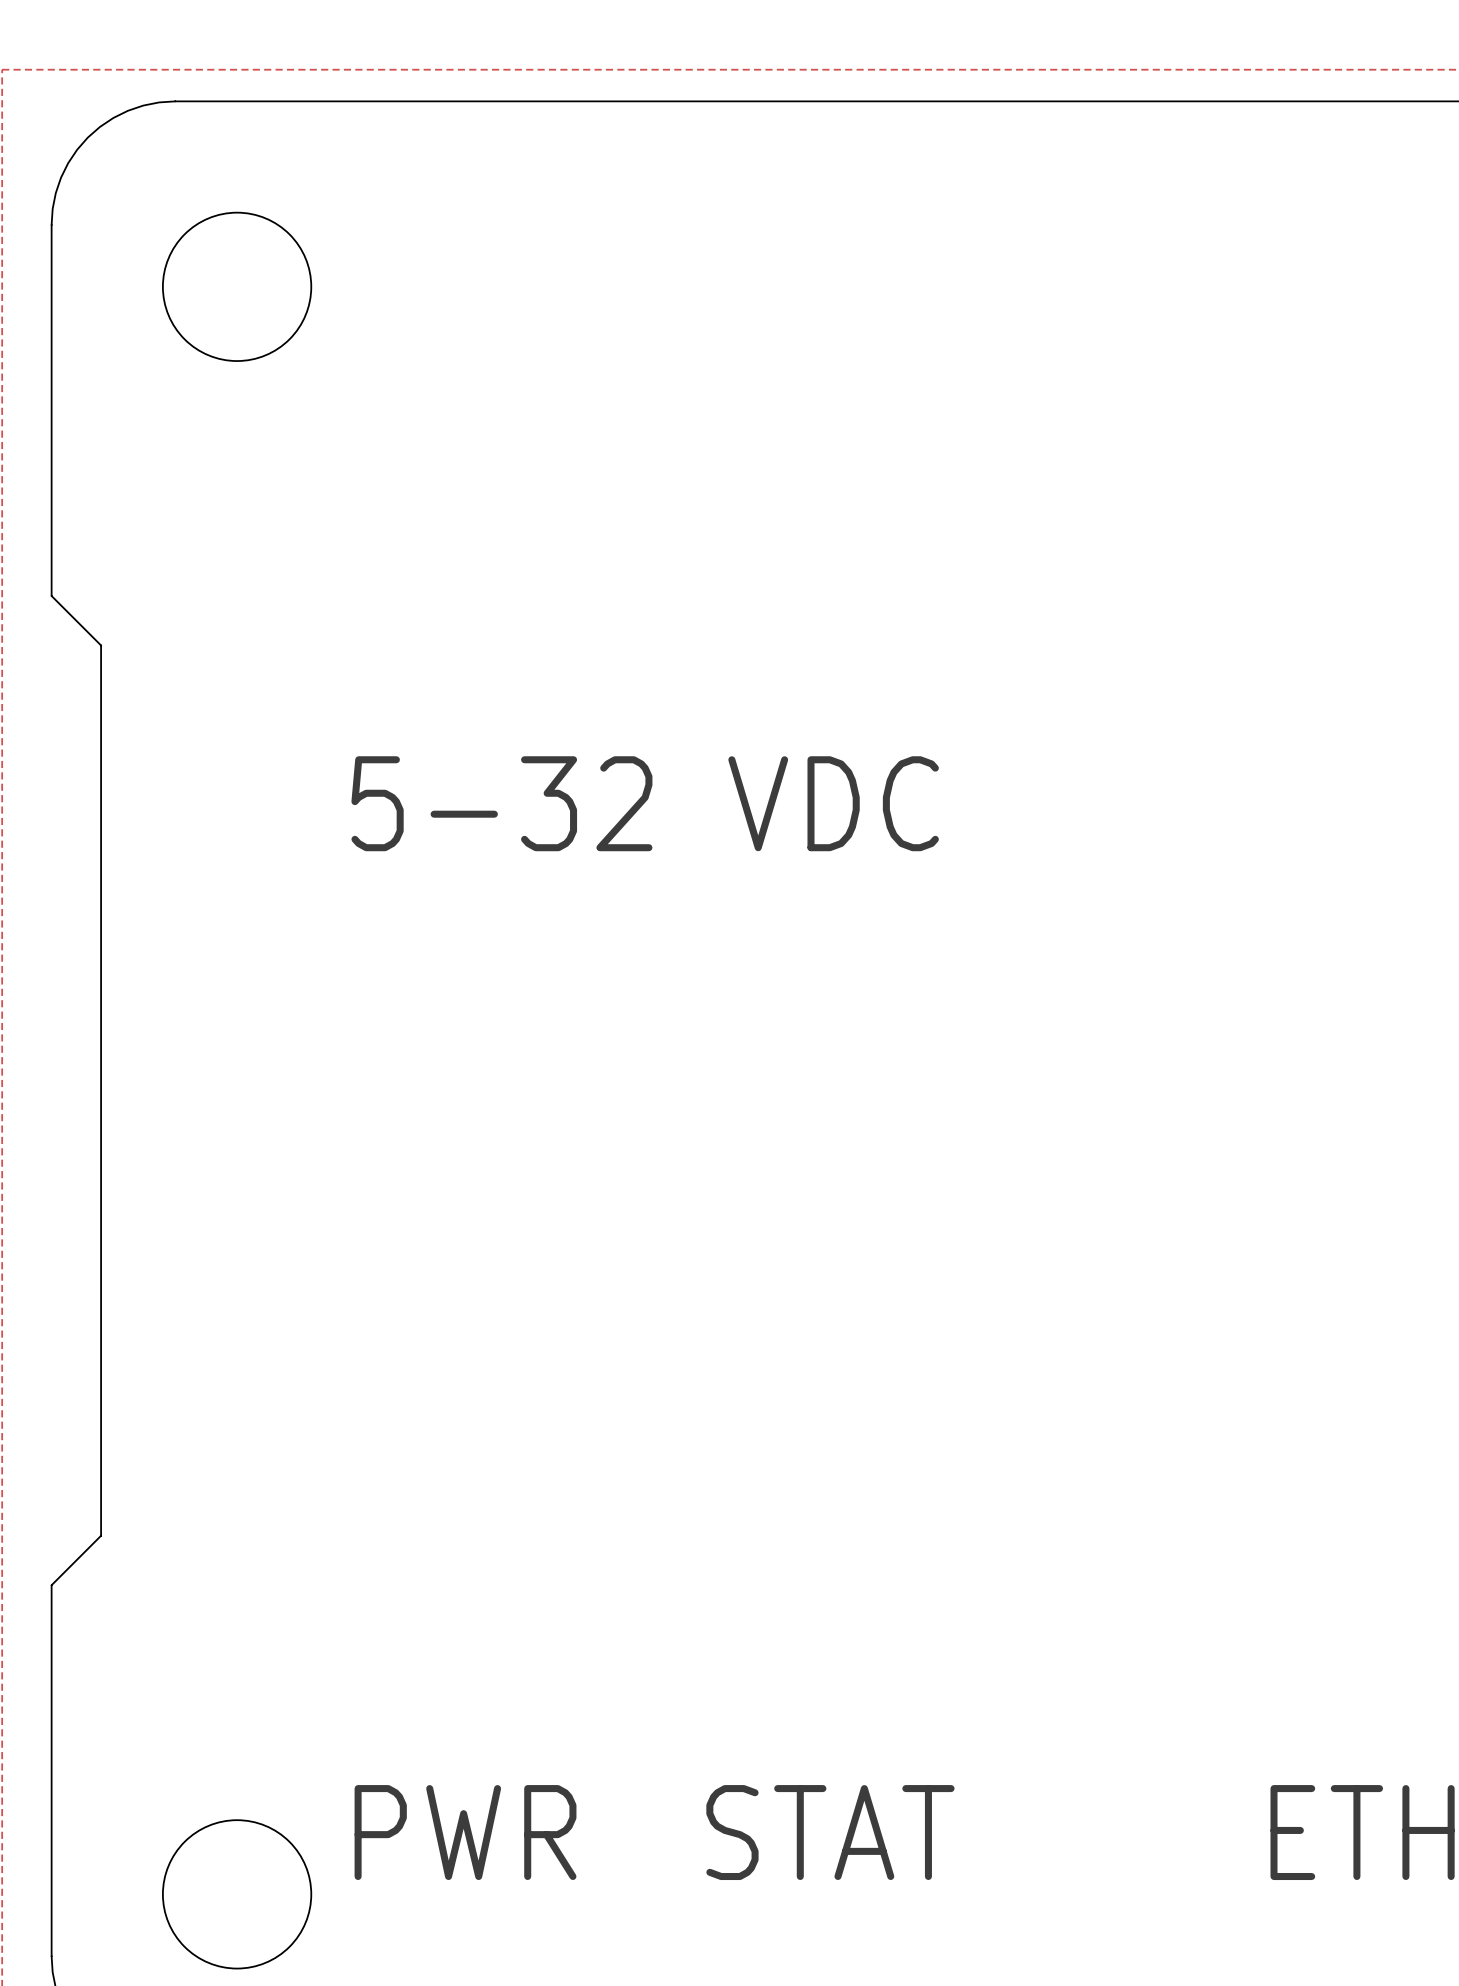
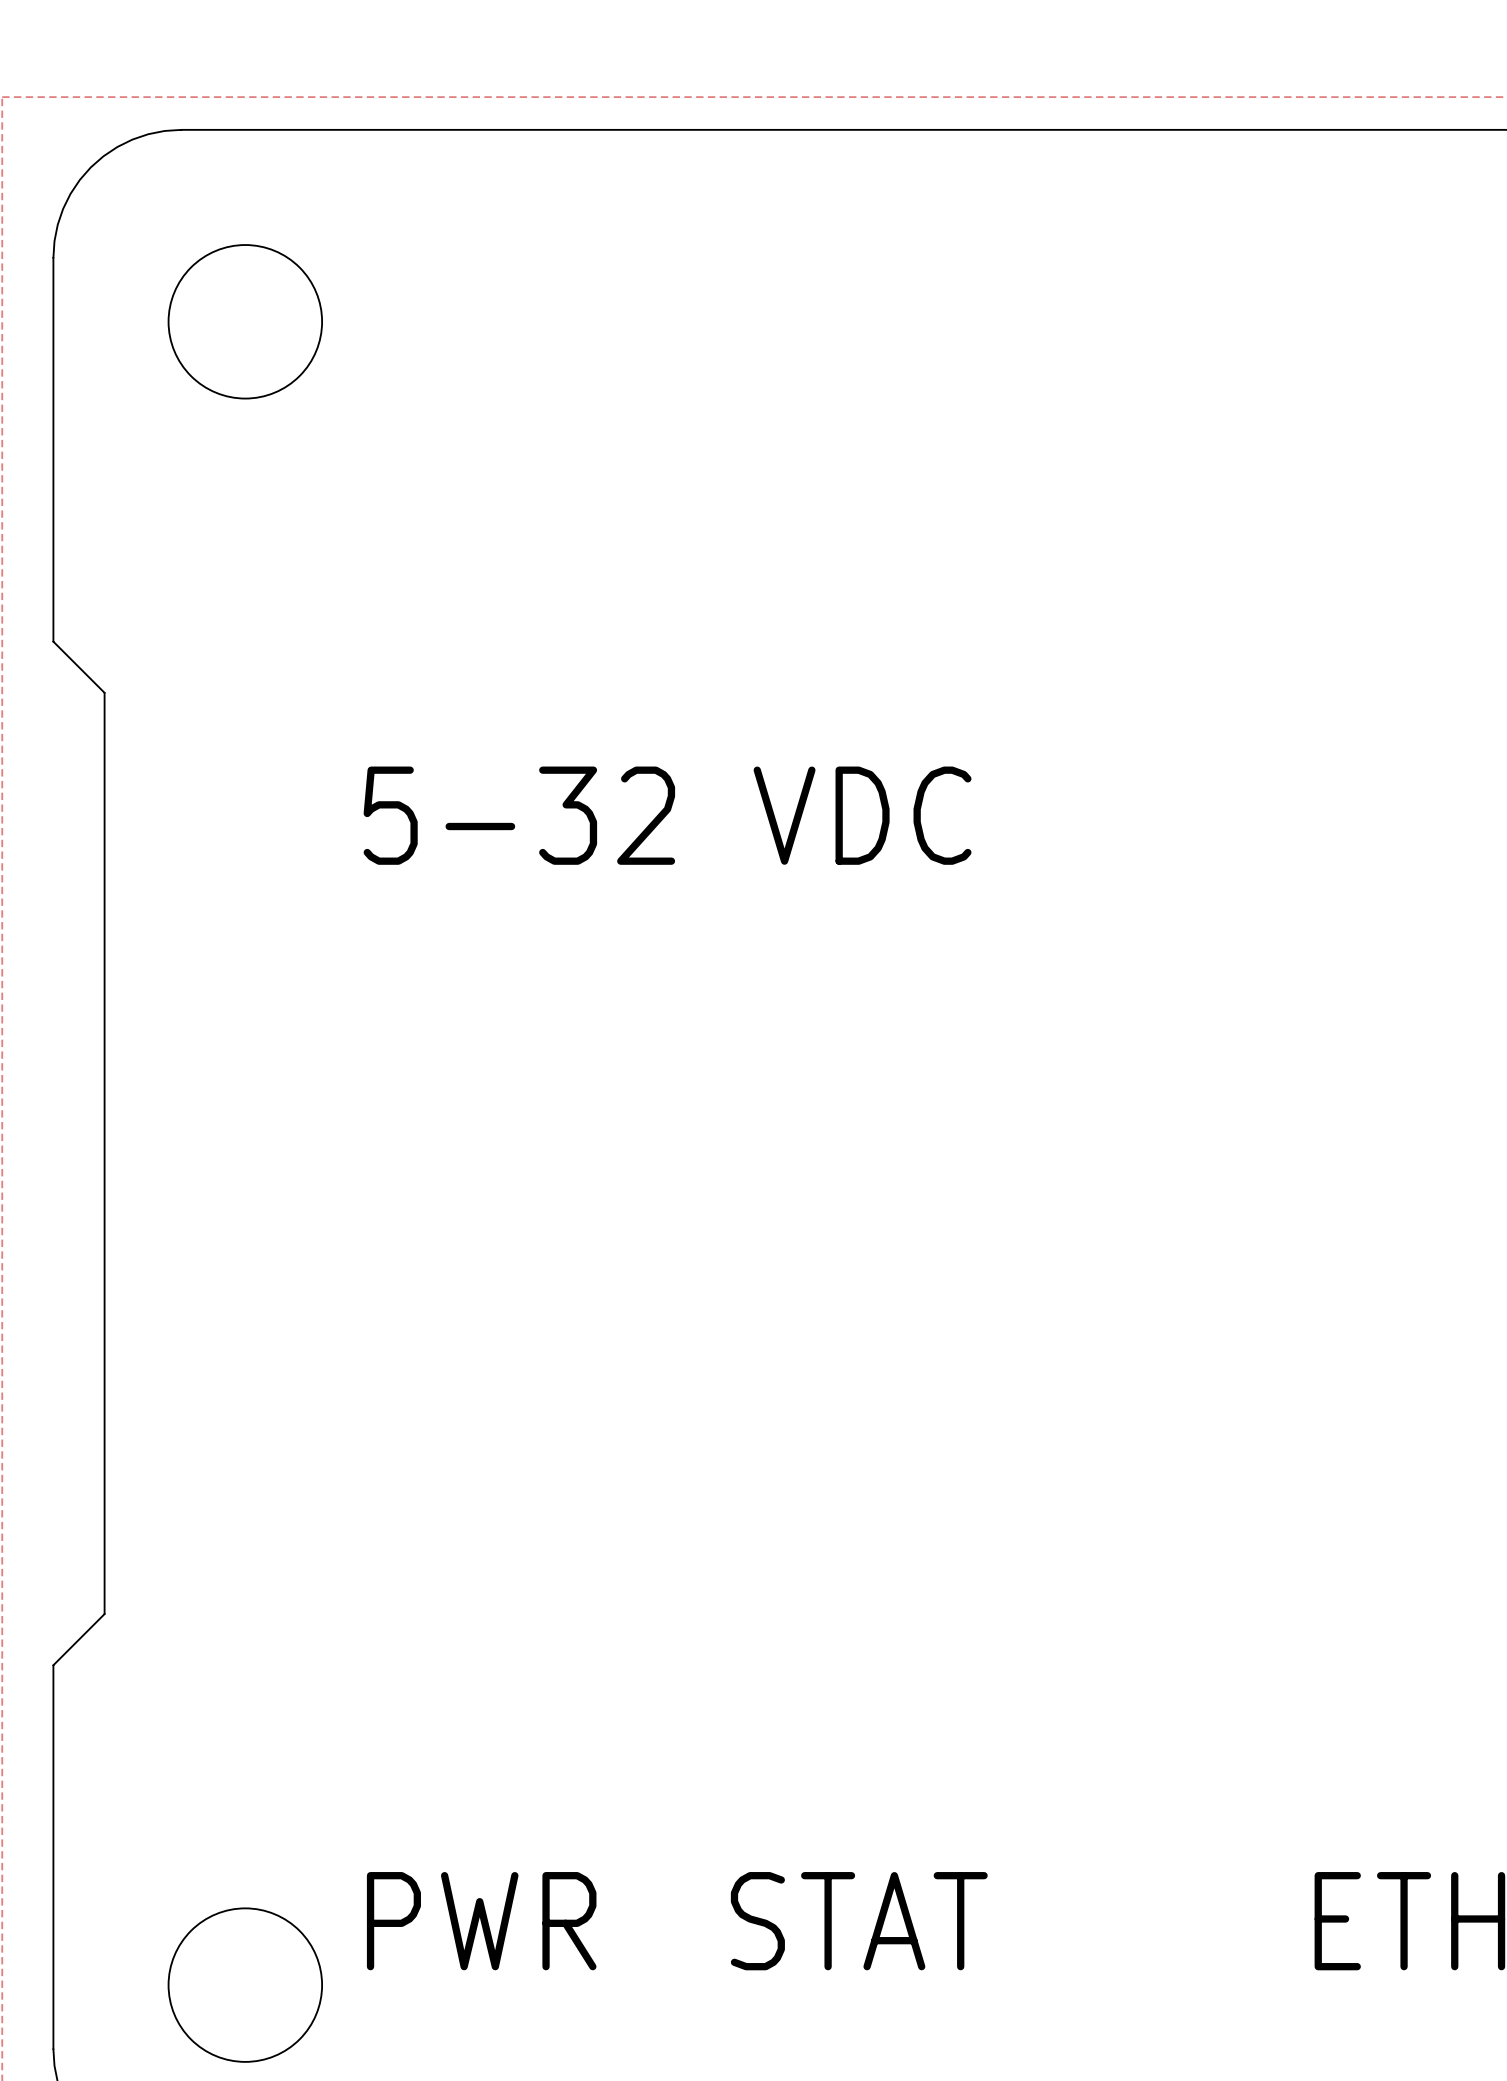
text position: 5-32 VDC (645, 803) -> 5-32 VDC (667, 815)

